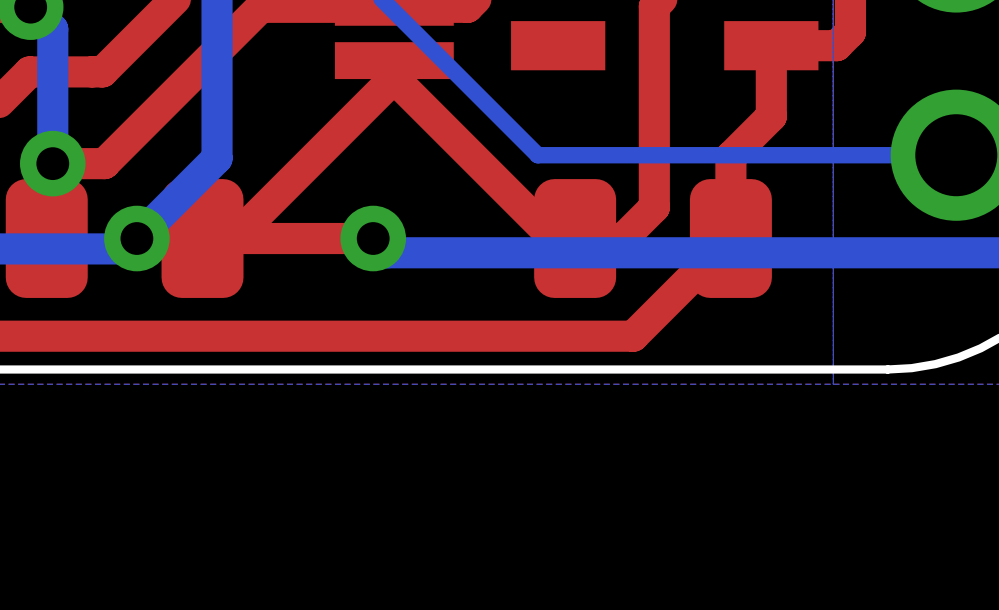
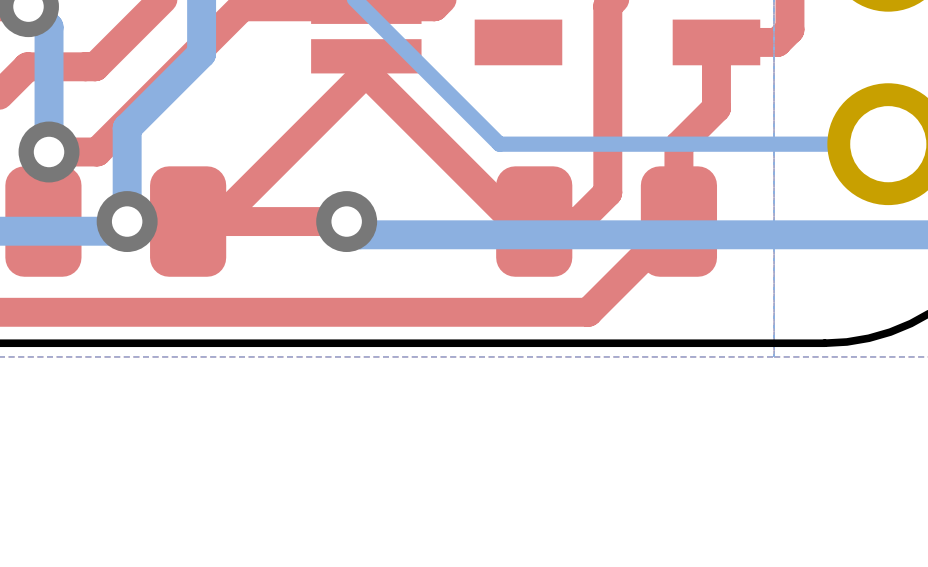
bottom track: (217, 57) (217, 158) (136, 238) -> (201, 53) (127, 128) (127, 221)

